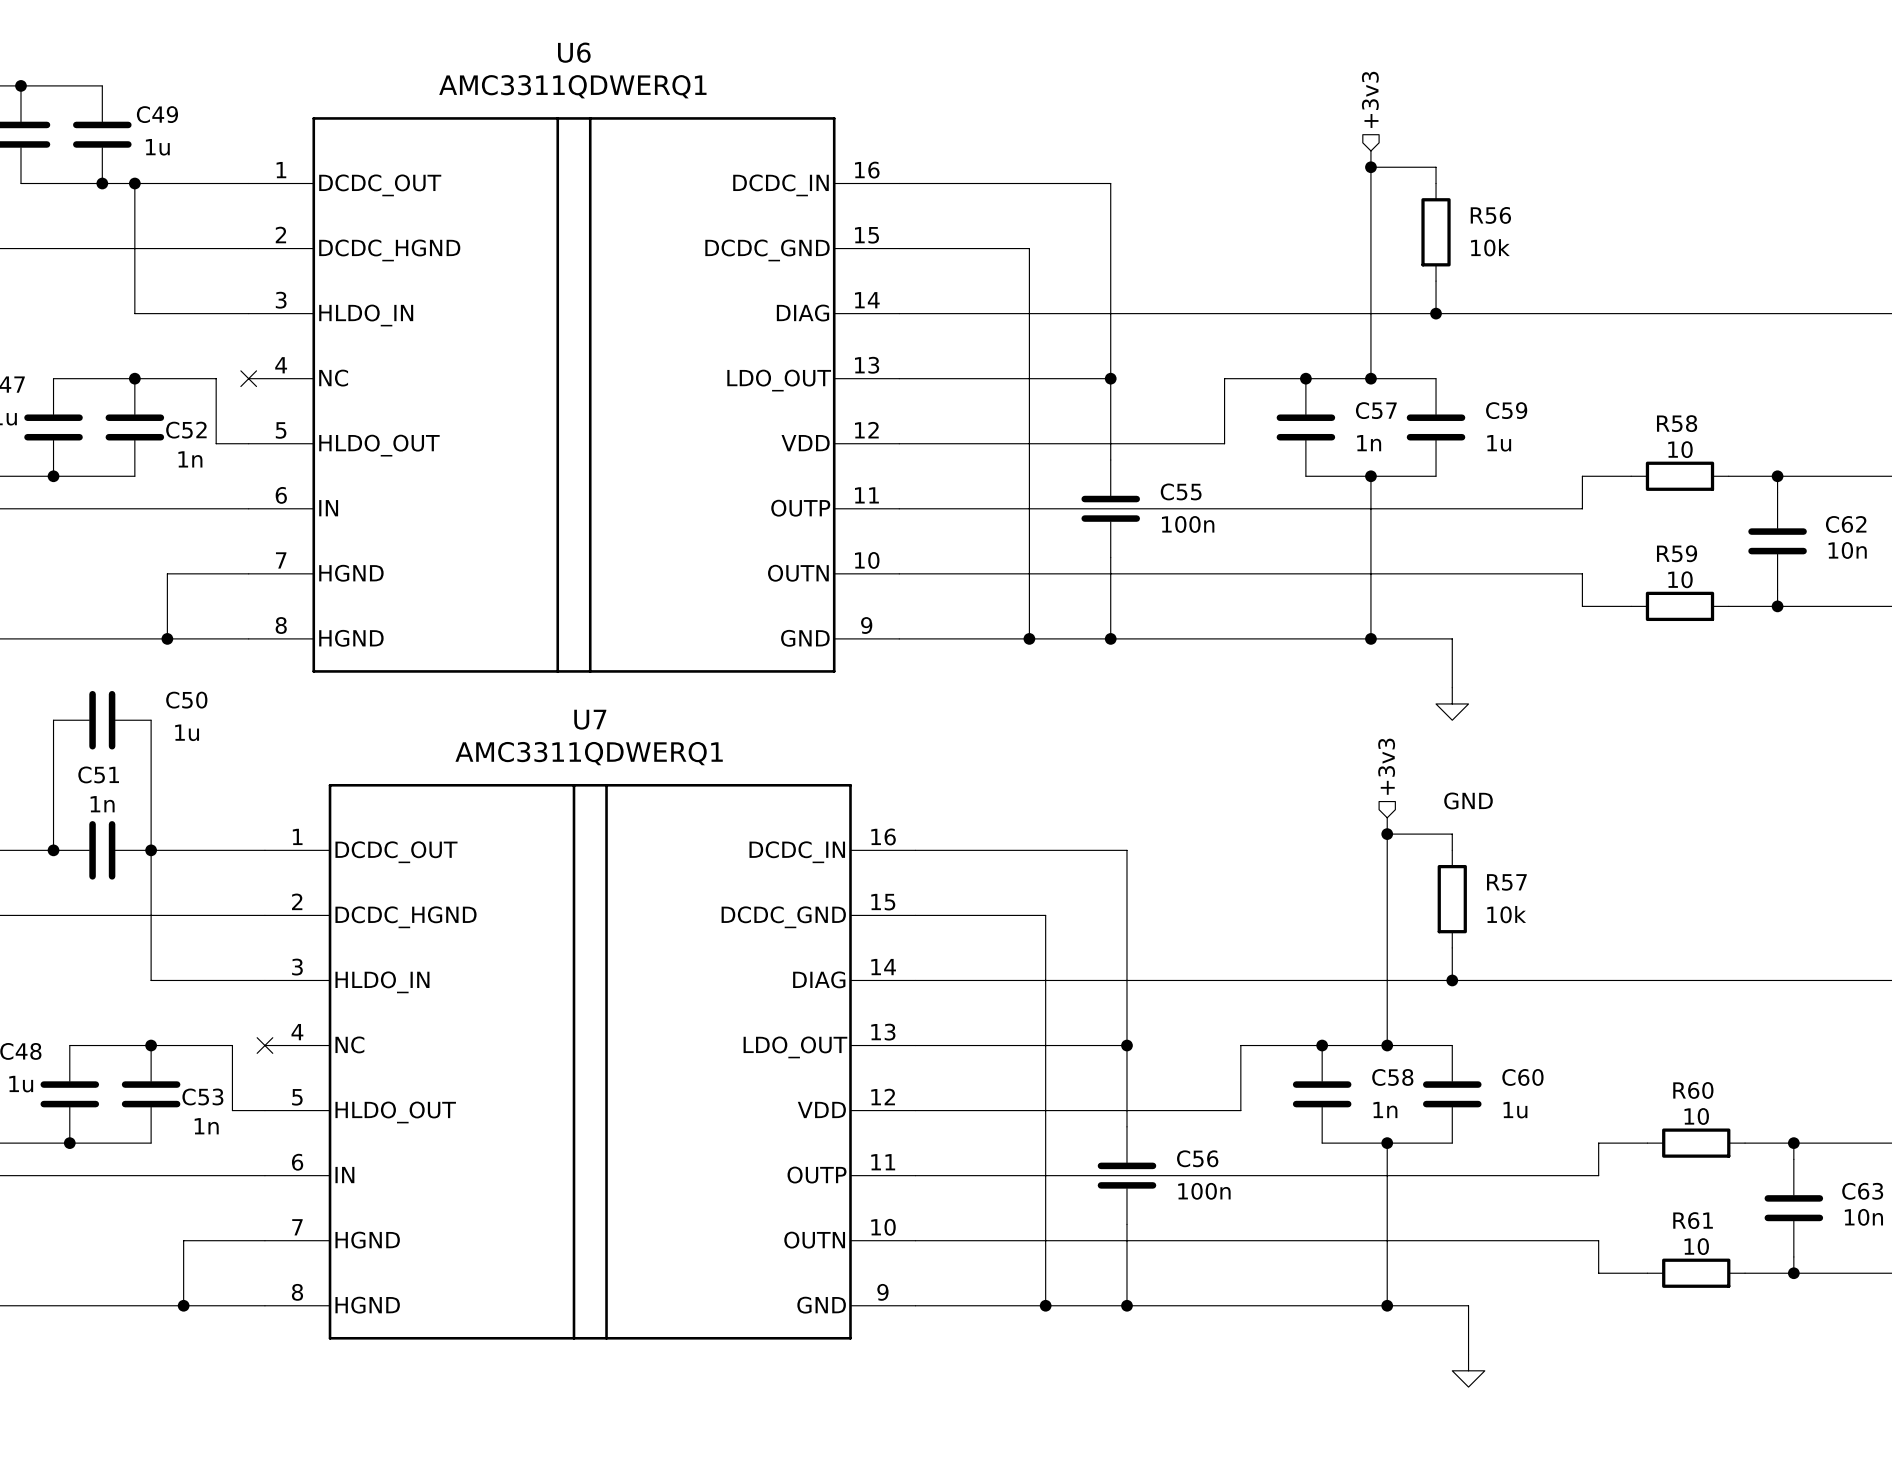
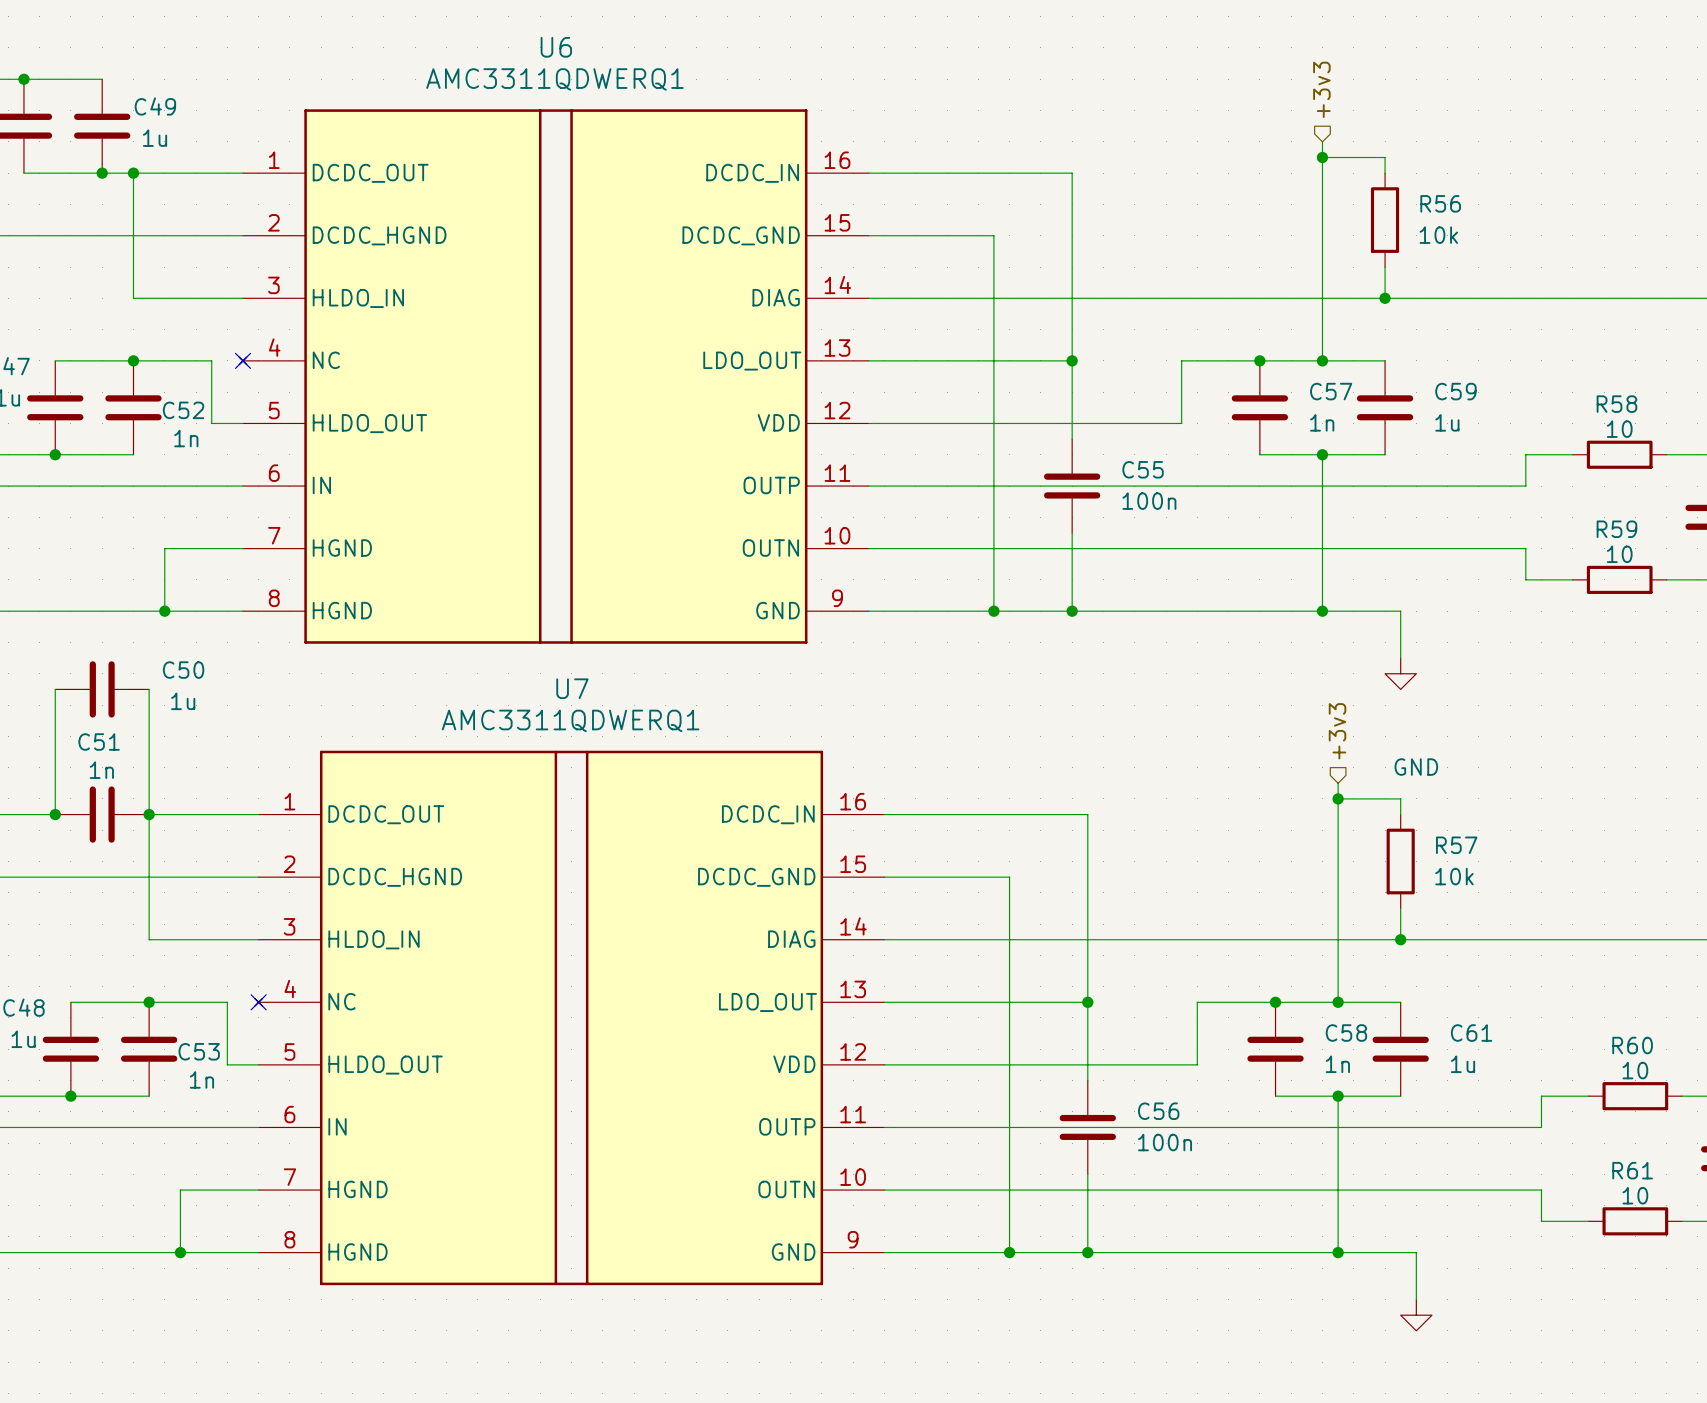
U6 symbol: [248, 117, 900, 673] -> [239, 109, 869, 644]
U7 symbol: [264, 783, 916, 1340] -> [254, 750, 885, 1286]
C60 name: C60 (1522, 1077) -> C61 (1471, 1033)

